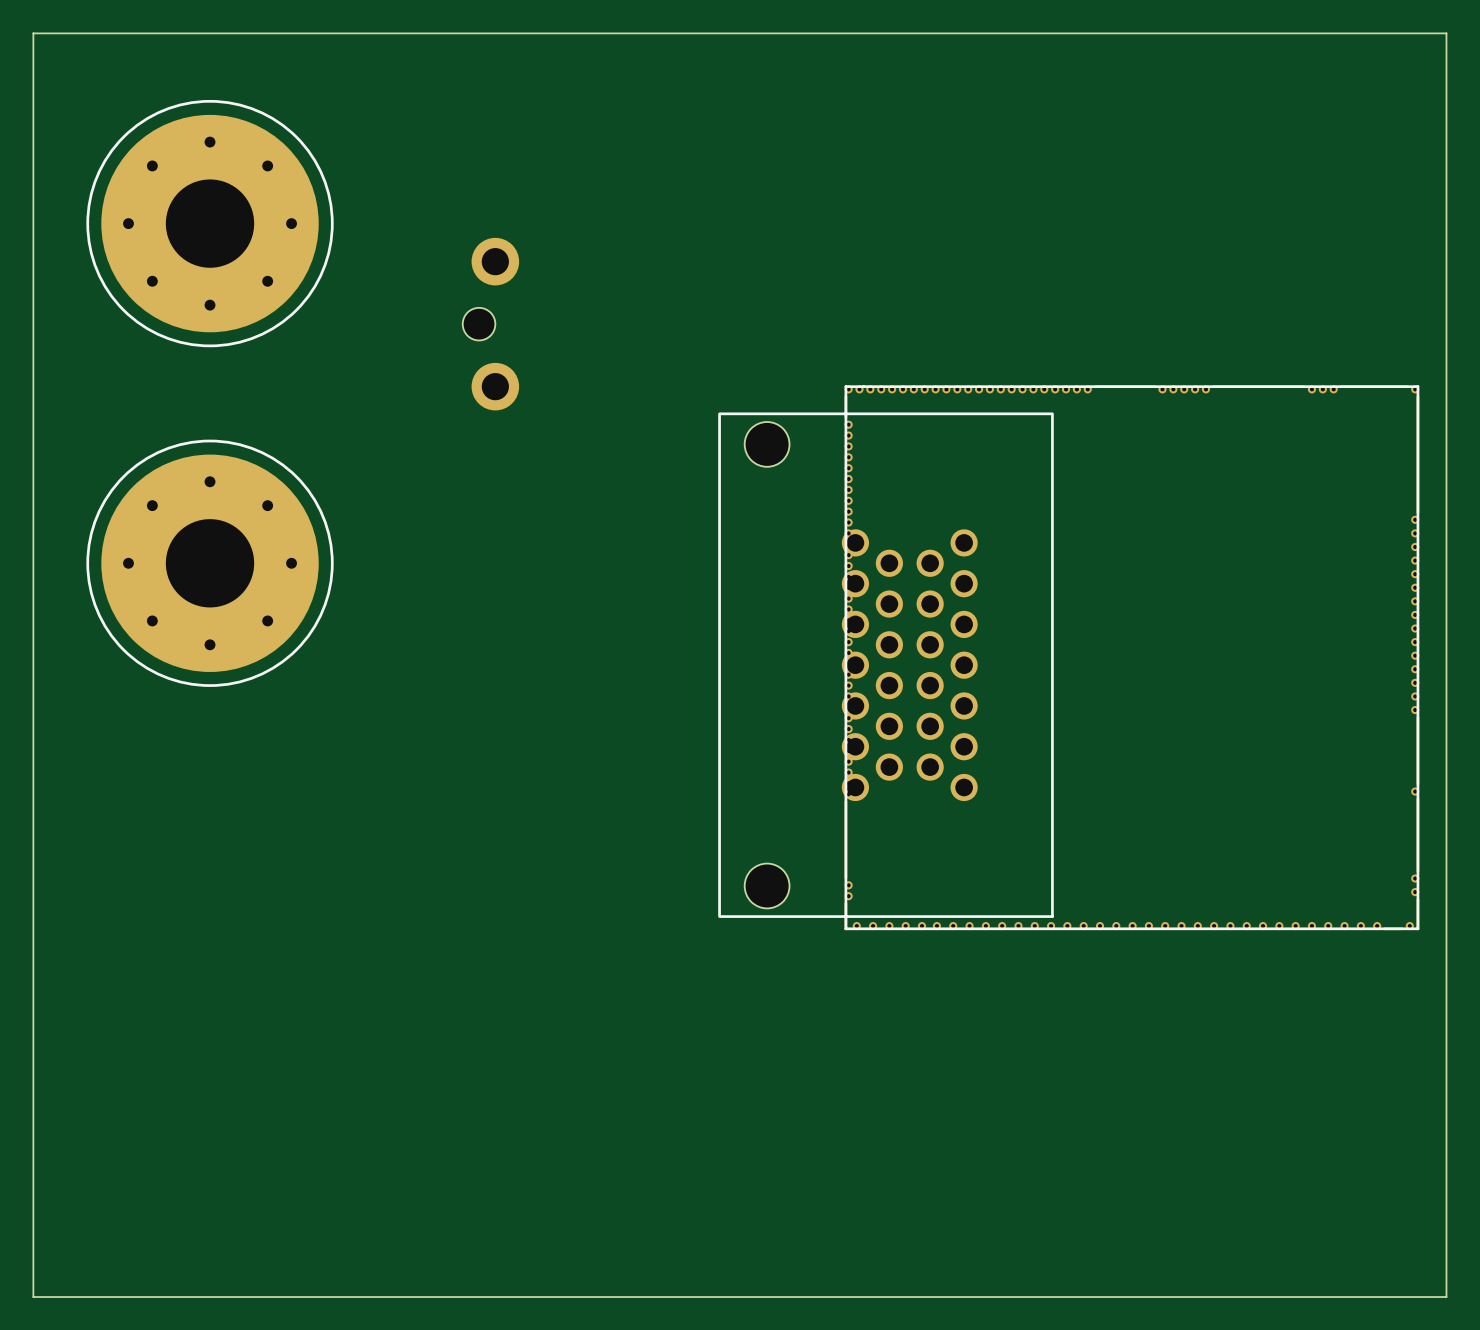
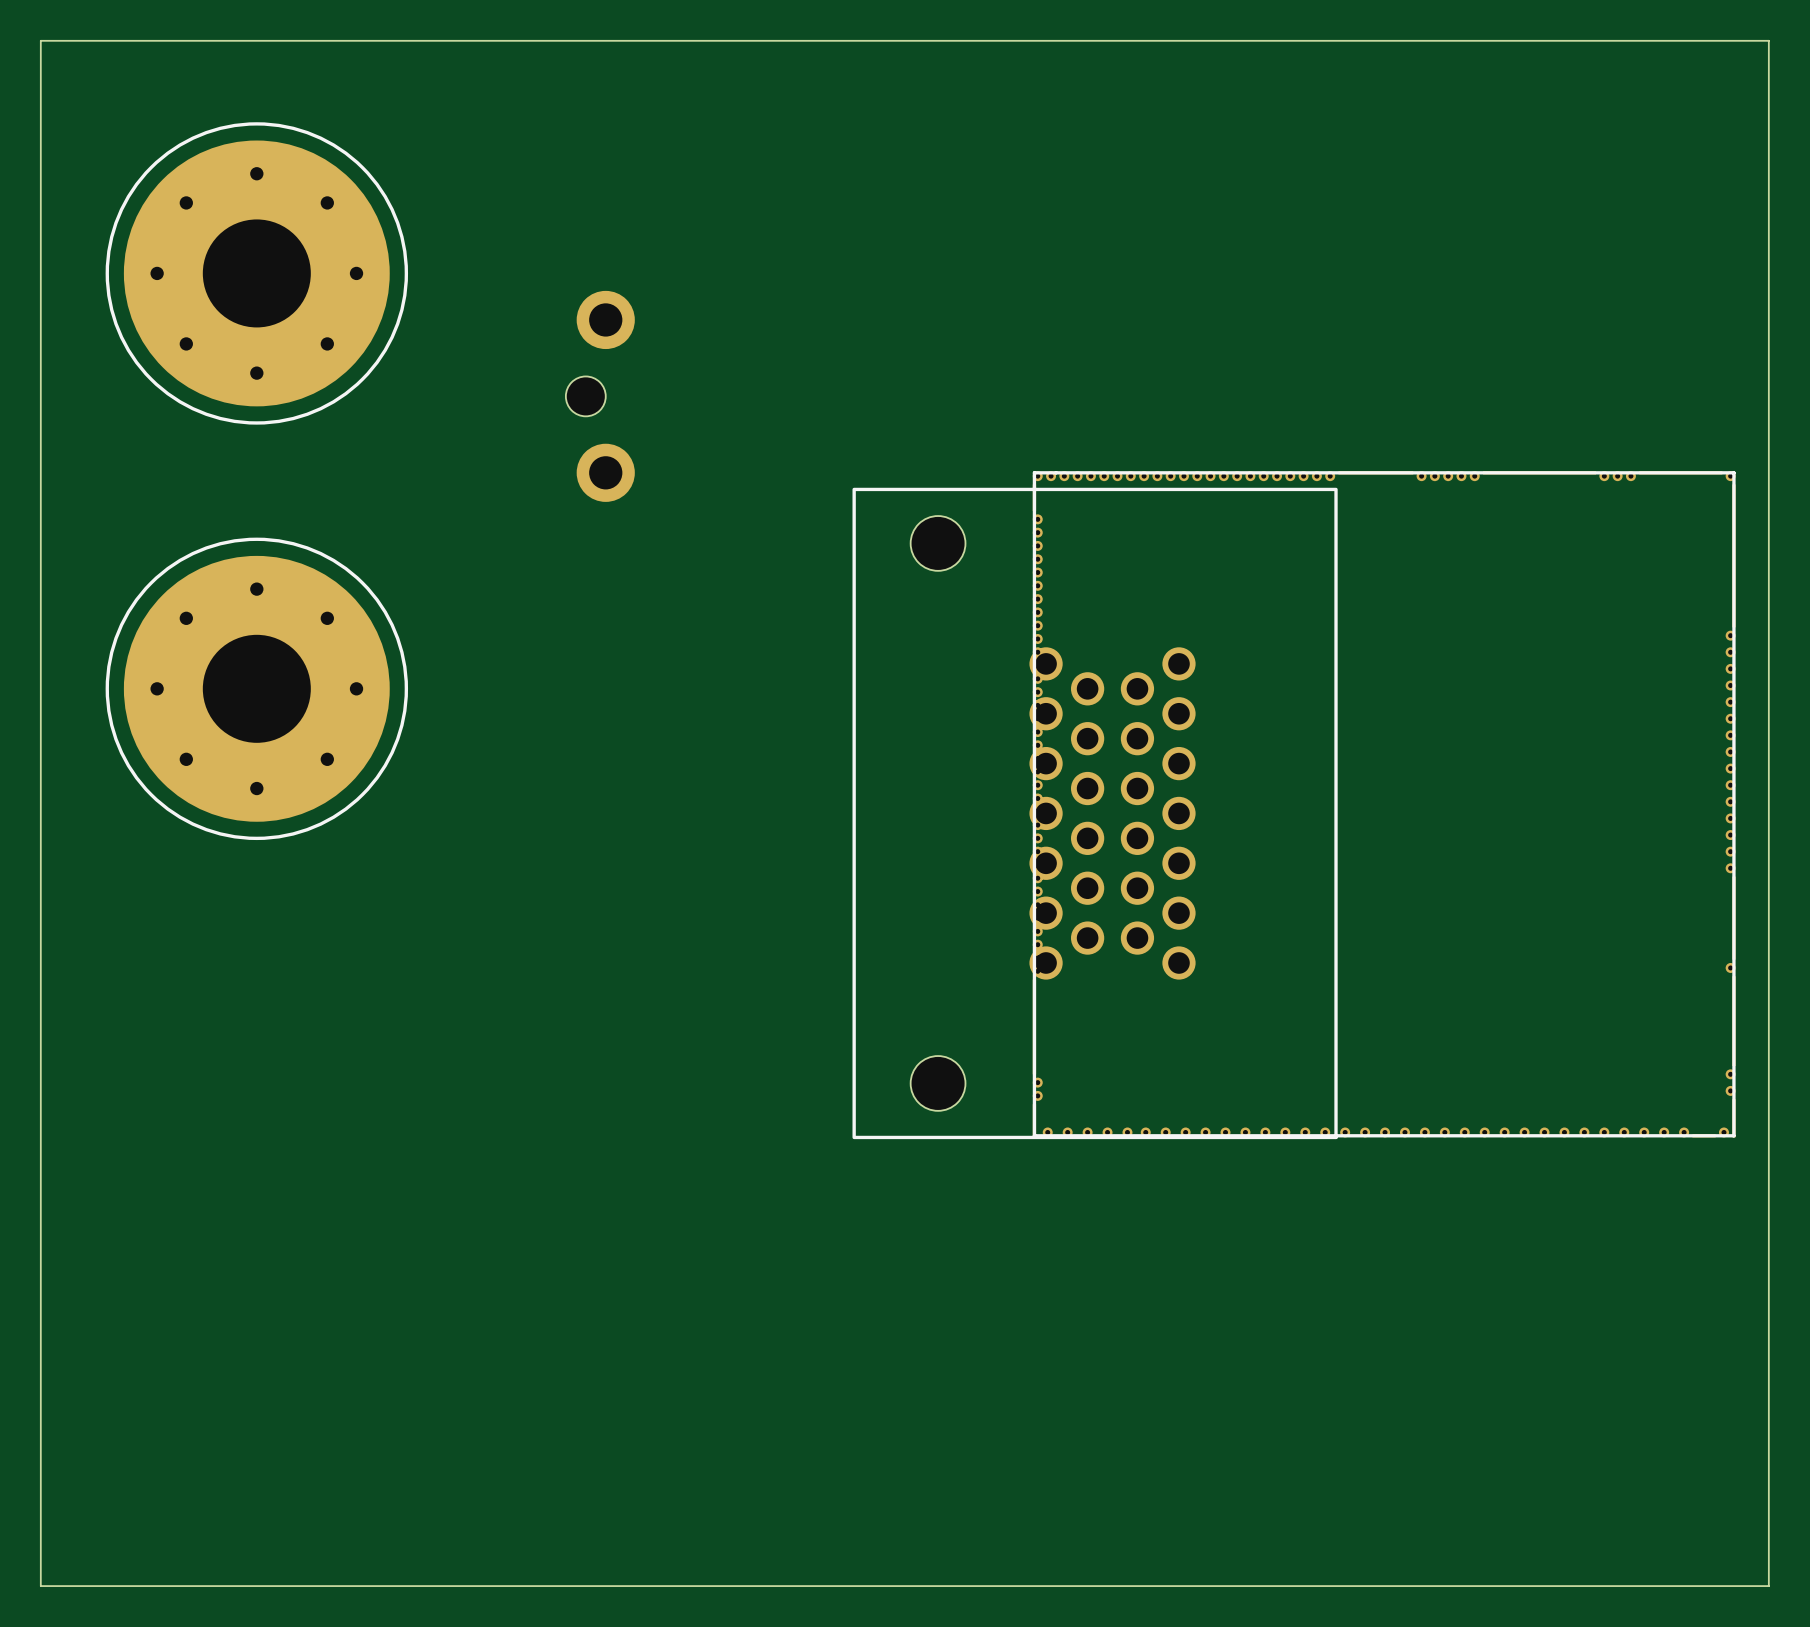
part footprint: [718, 412, 1054, 918] -> [852, 487, 1338, 1140]

